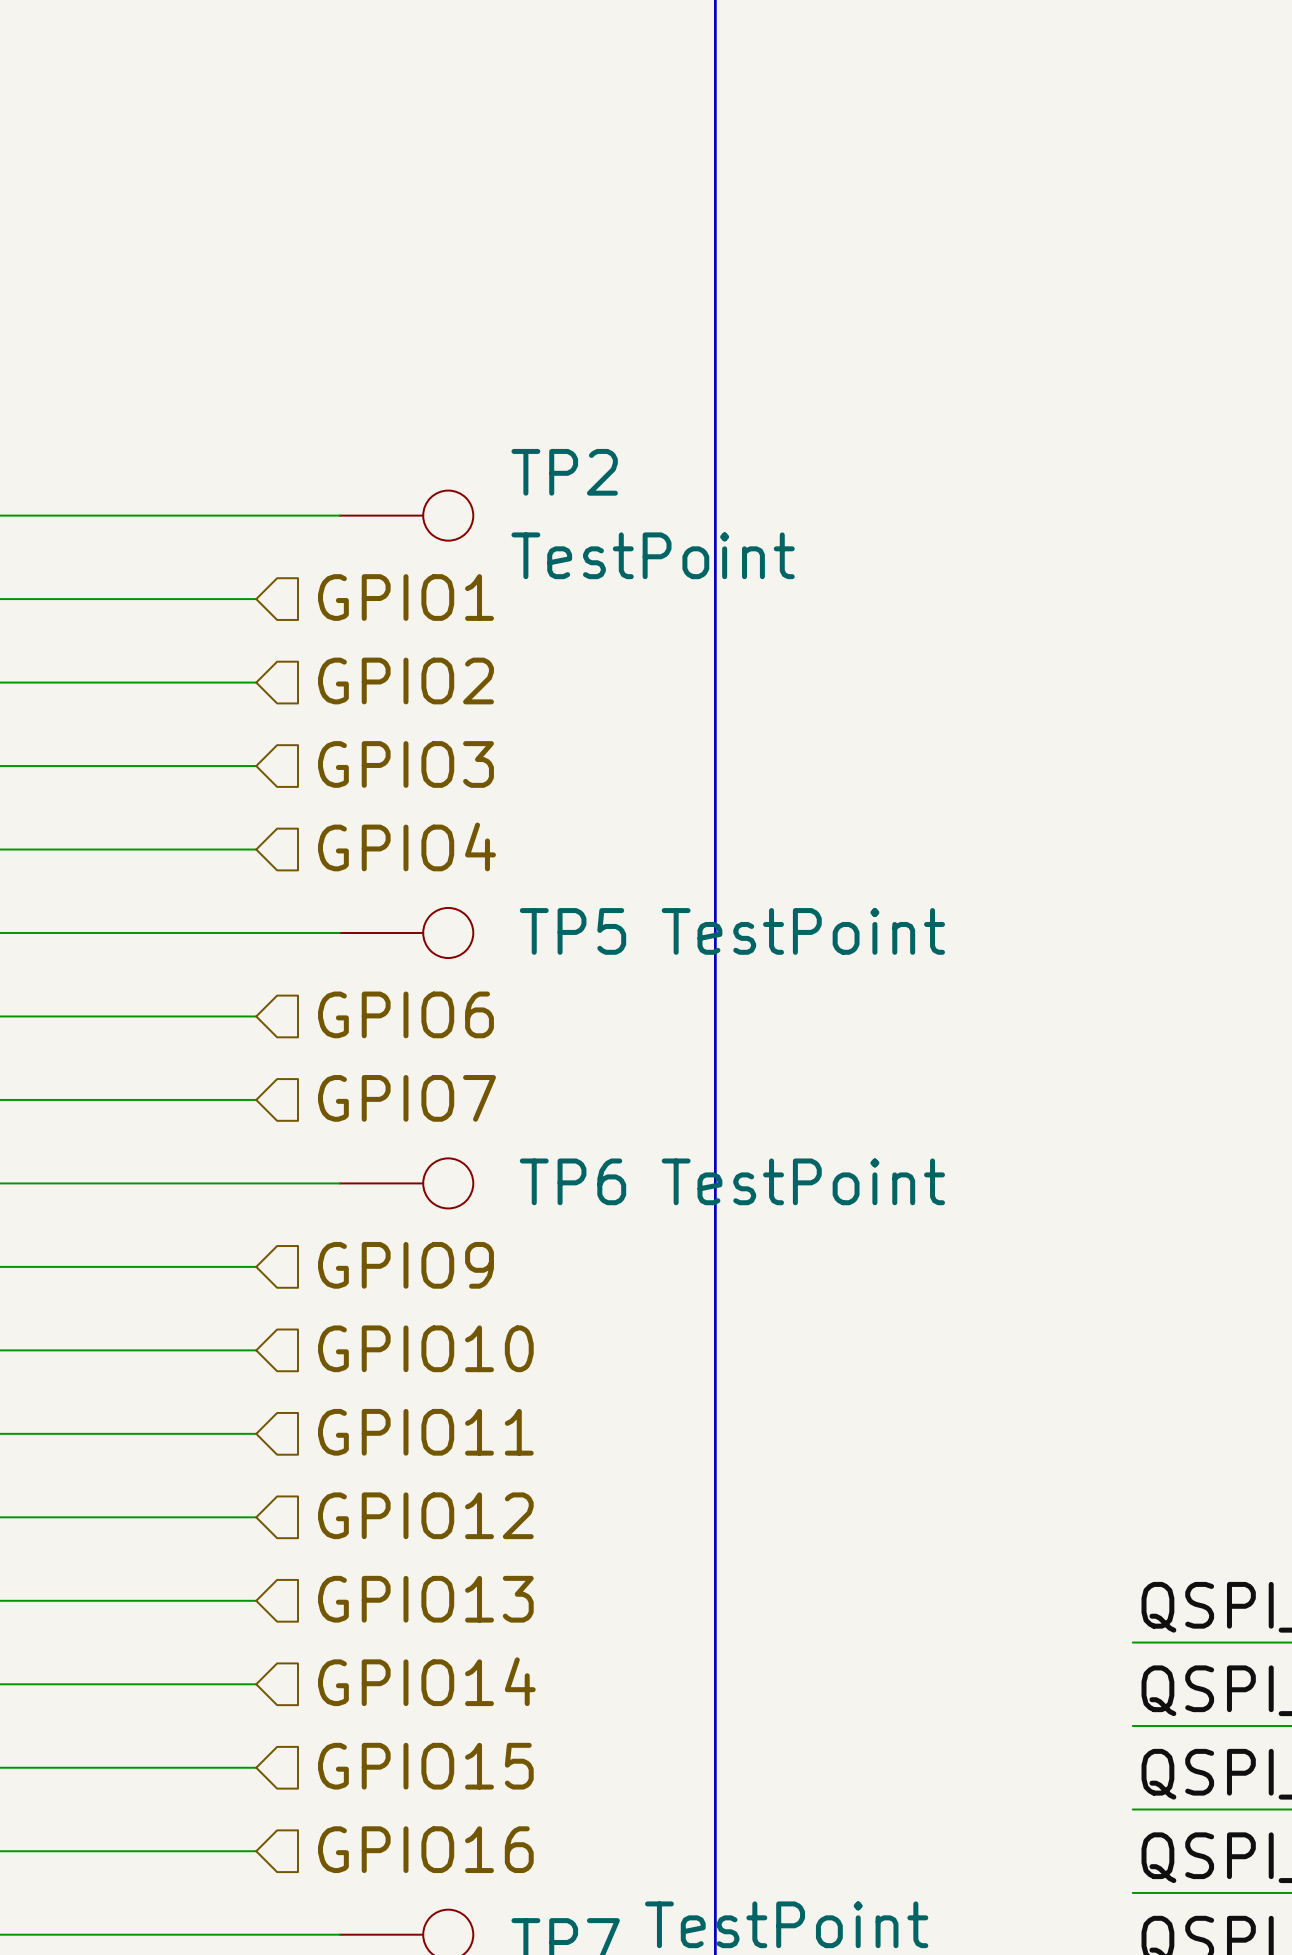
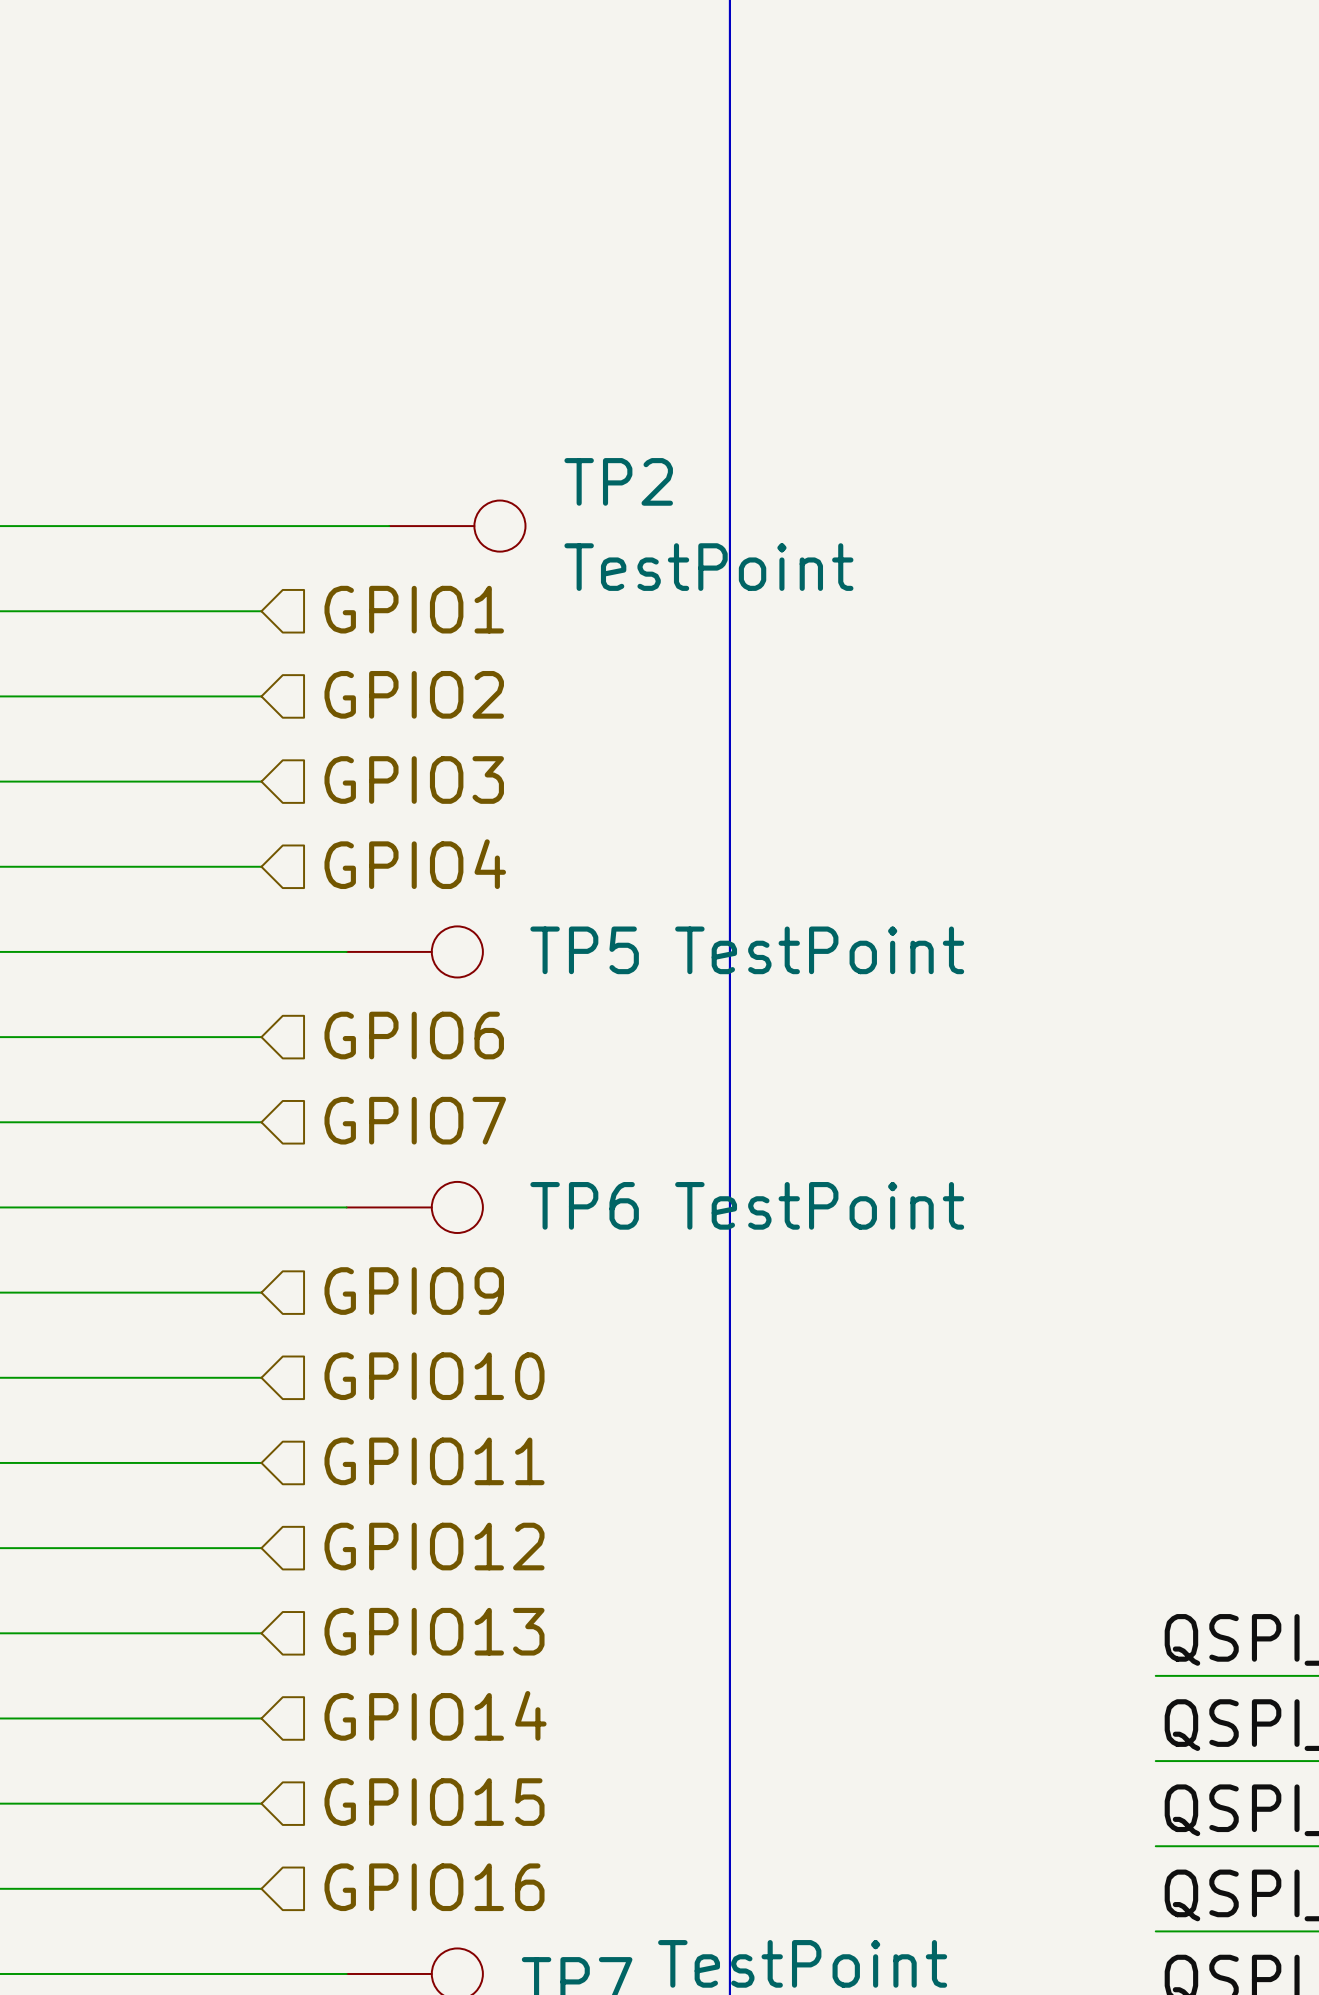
TP2 position: (406, 515) -> (457, 526)

